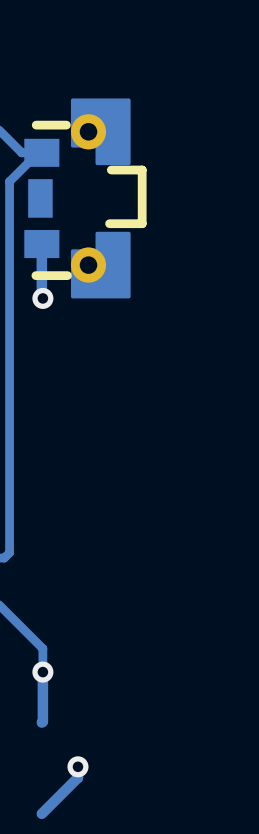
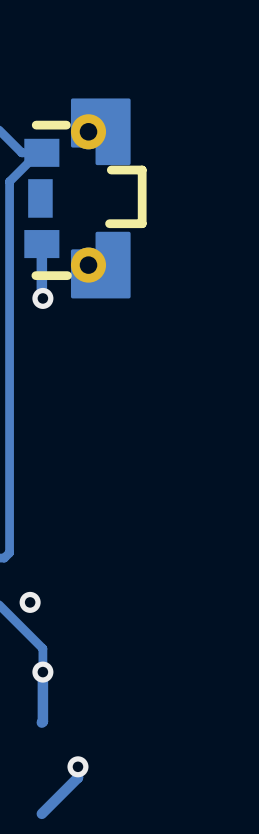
via: none -> (30, 602)

